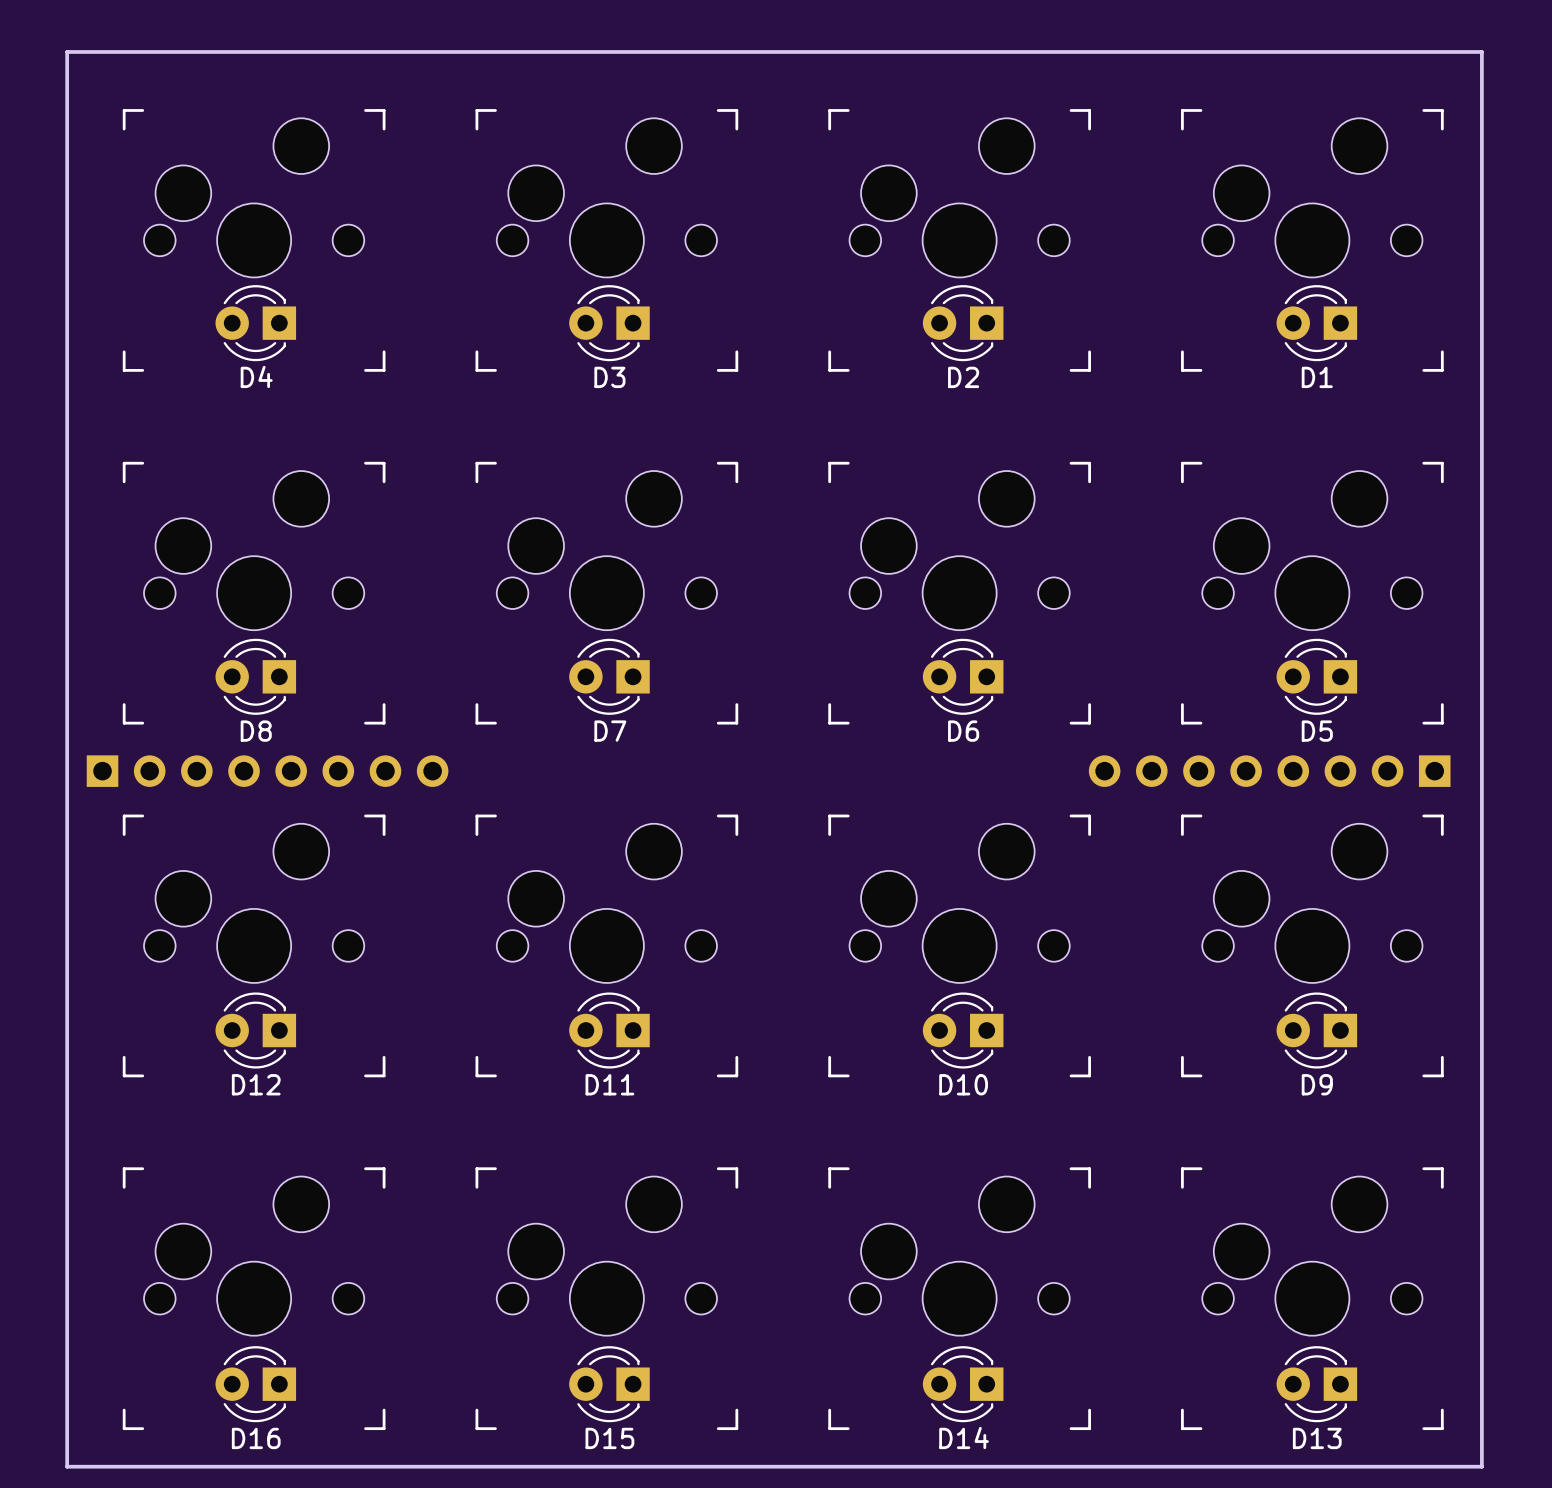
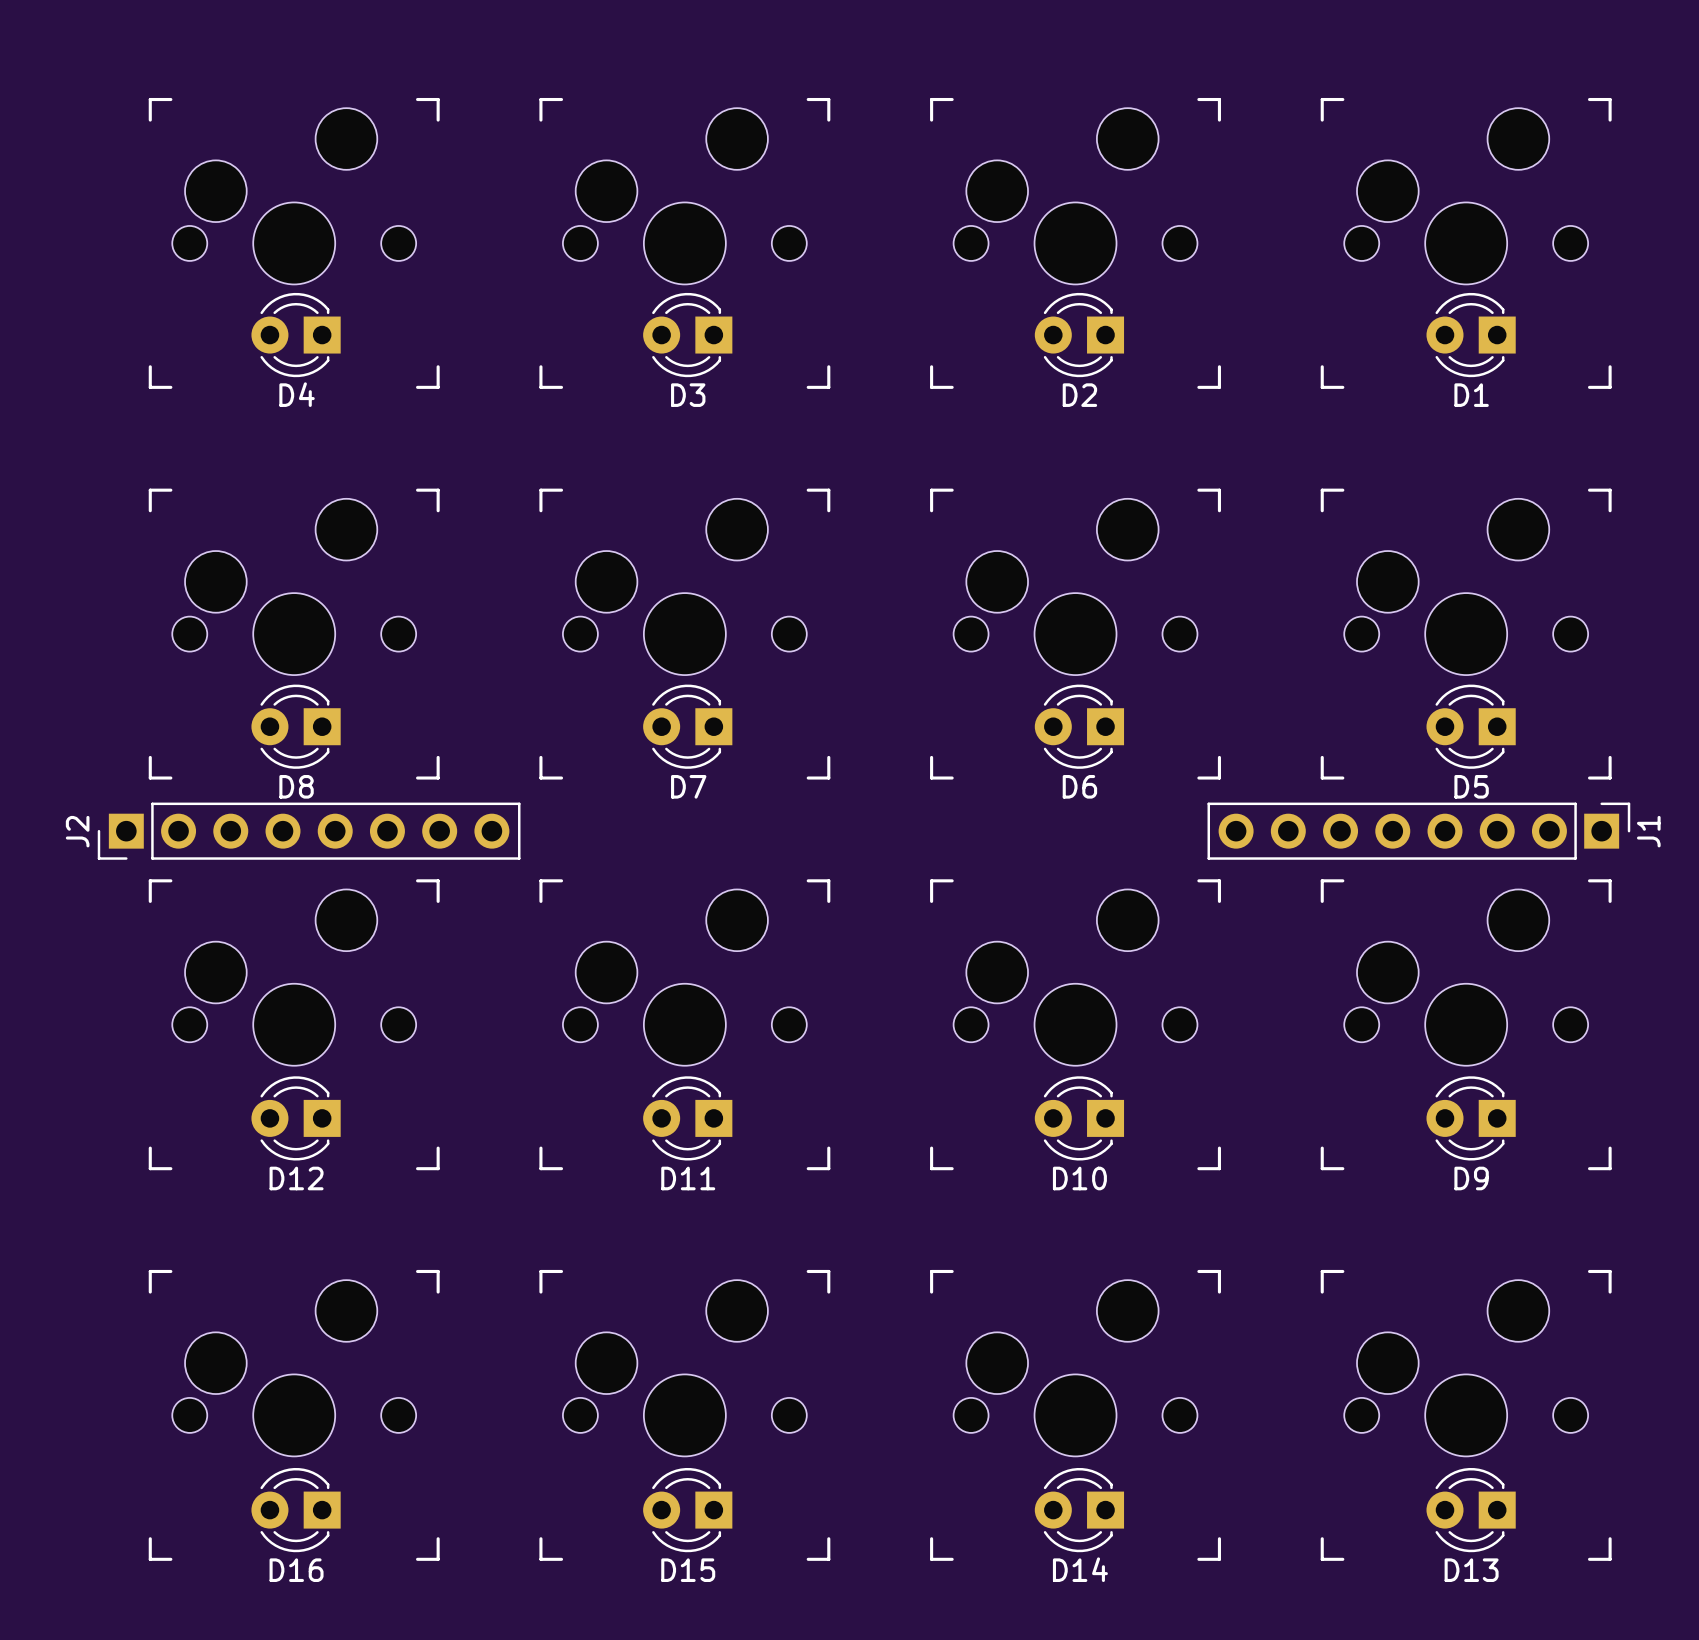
board edge: (67, 51) (1481, 51) (1481, 1466) (67, 1466) (67, 51) -> none
J2 side: bottom (267, 771) -> top (309, 831)
J1 side: bottom (1269, 771) -> top (1418, 831)

